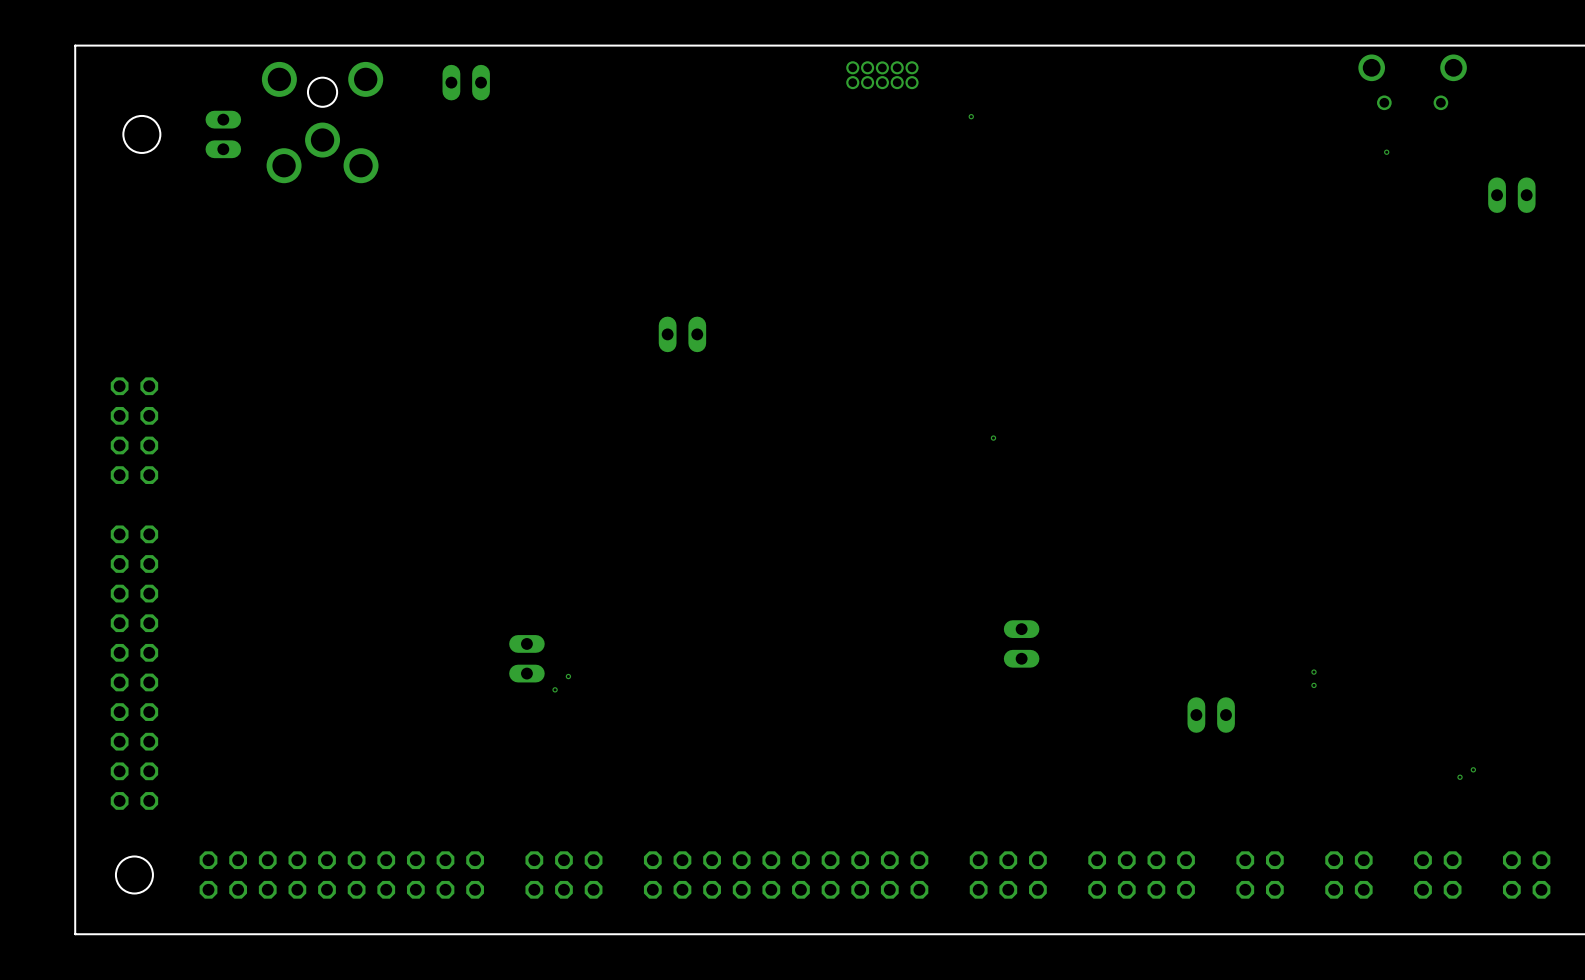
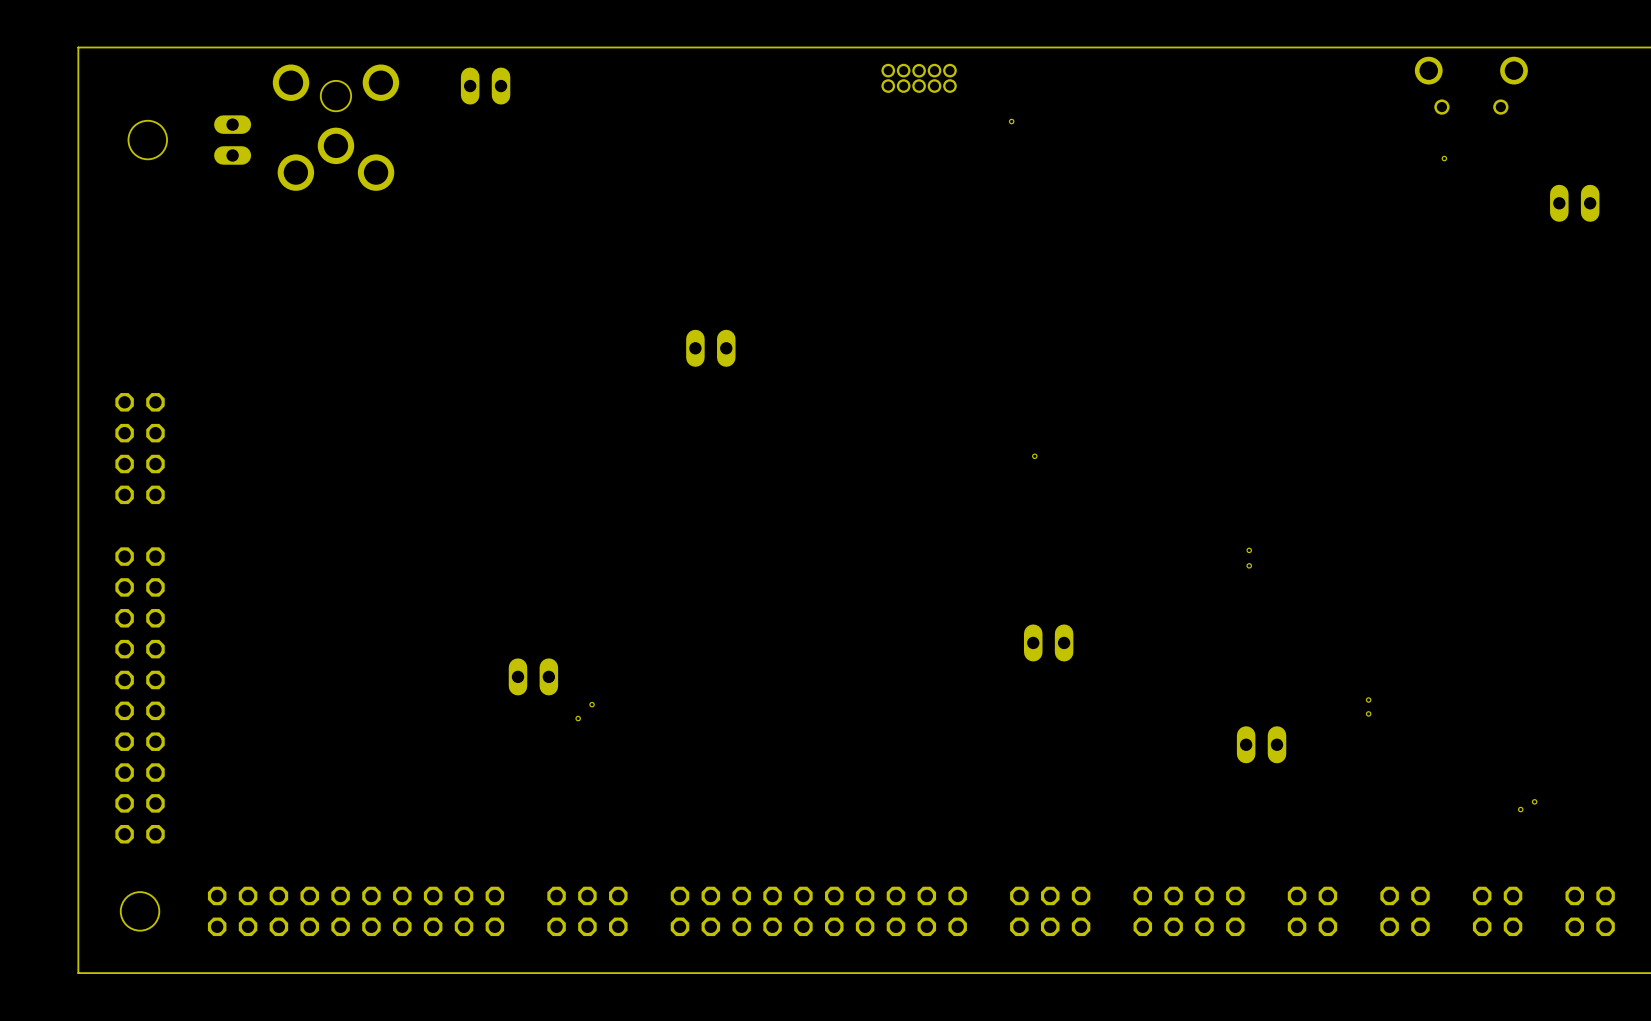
part: none -> (1249, 550)
part: none -> (1249, 565)
part rotation: 0° (1021, 643) -> 90° clockwise (1048, 642)
part position: (1021, 643) -> (1048, 642)
part rotation: 0° (526, 658) -> 90° clockwise (533, 676)

